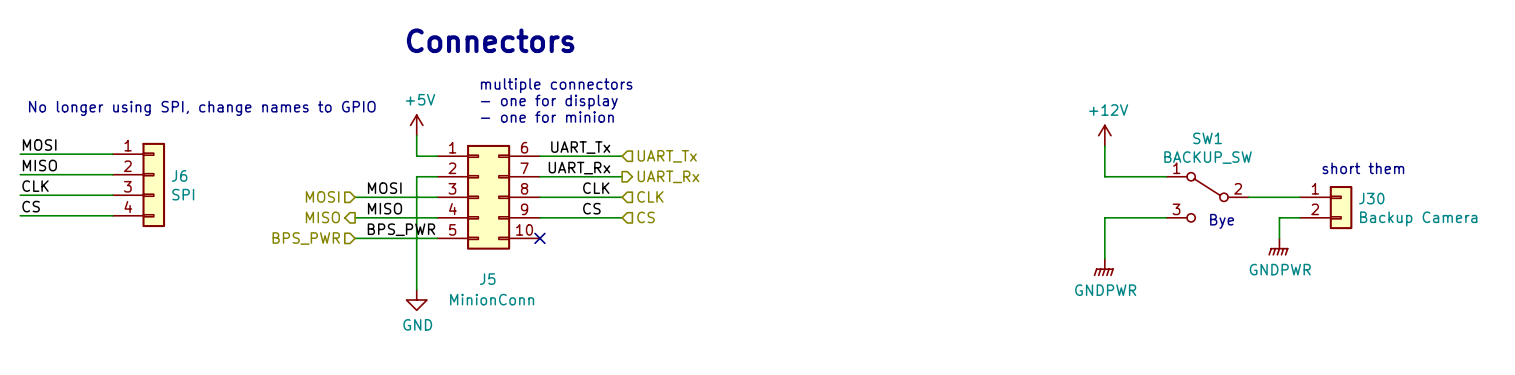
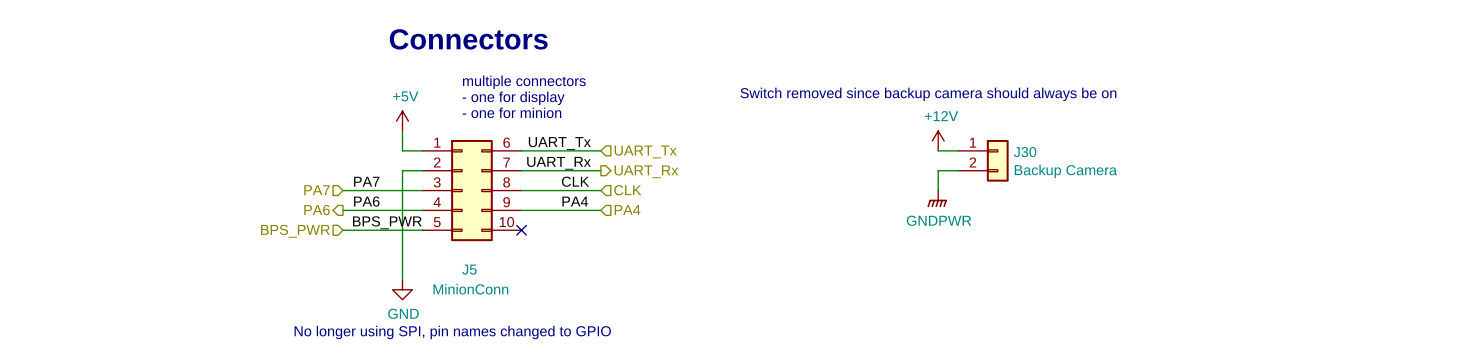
text: none -> Switch removed since backup camera should always be on (928, 94)
text: No longer using SPI, change names to GPIO (202, 108) -> none
power symbol position: +12V (1104, 135) -> +12V (938, 140)
label: MOSI (39, 144) -> none
wire: (1104, 145) (1104, 176) (1166, 176) -> none
wire: (20, 154) (112, 154) -> none
wire: none -> (938, 150) (958, 150)
label: MISO (39, 165) -> none
text: short them (1363, 168) -> none
wire: (20, 174) (112, 174) -> none
wire: none -> (958, 170) (938, 170) (938, 190)
J6: SPI (138, 184) -> none
label: CLK (35, 186) -> none
label: MOSI (384, 188) -> PA7 (366, 181)
wire: (20, 195) (112, 195) -> none
hierarchical label: MOSI (322, 196) -> PA7 (316, 190)
SW1: BACKUP_SW (1207, 197) -> none
wire: (1248, 197) (1299, 197) -> none
label: CS (31, 206) -> none
J30 position: (1326, 207) -> (983, 160)
label: MISO (385, 208) -> PA6 (366, 201)
label: CS (591, 208) -> PA4 (575, 201)
wire: (20, 215) (112, 215) -> none
hierarchical label: MISO (322, 217) -> PA6 (317, 210)
hierarchical label: CS (646, 217) -> PA4 (627, 210)
wire: (1166, 217) (1104, 217) (1104, 258) -> none
wire: (1299, 217) (1279, 217) (1279, 238) -> none
text: Bye (1222, 221) -> none
power symbol: GNDPWR (1278, 247) -> none
power symbol position: GNDPWR (1103, 267) -> GNDPWR (937, 198)
text: none -> No longer using SPI, pin names changed to GPIO (452, 332)

